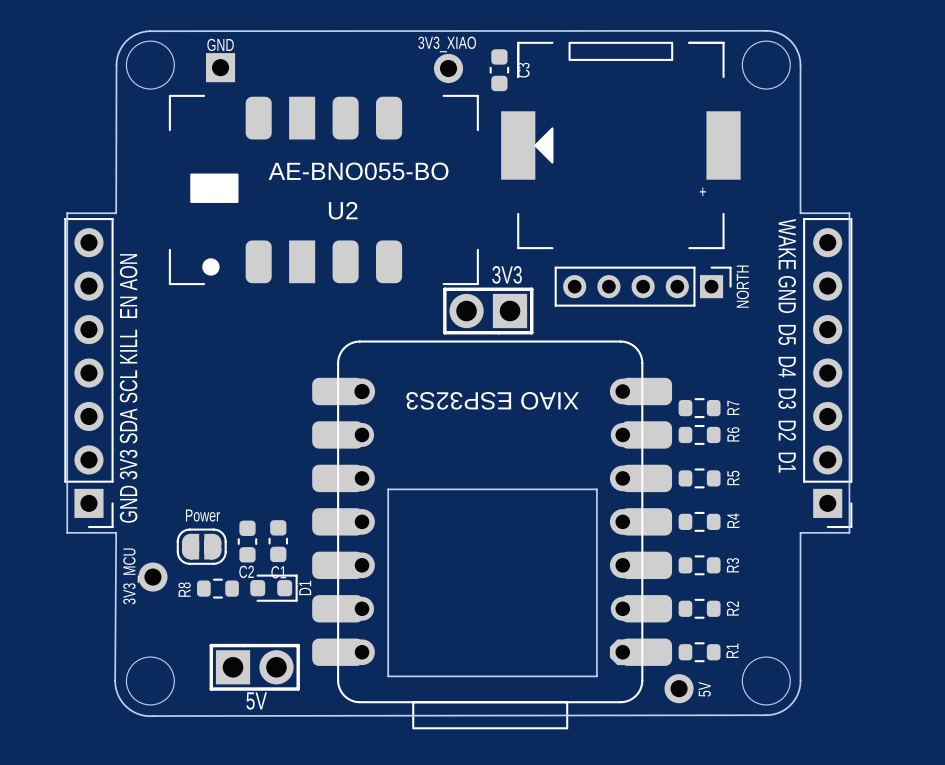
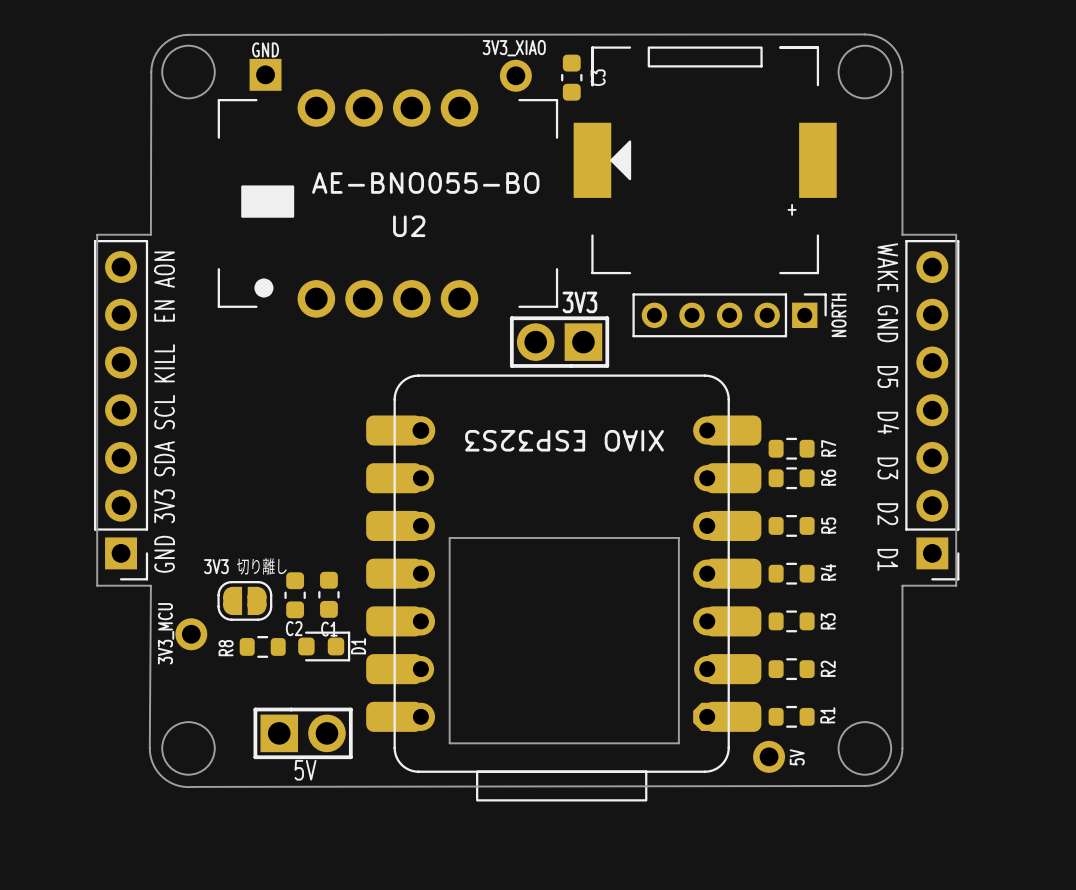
U2 footprint: [168, 94, 479, 286] -> [217, 89, 559, 318]
part value: Power (202, 515) -> 3V3 切り離し (245, 566)

